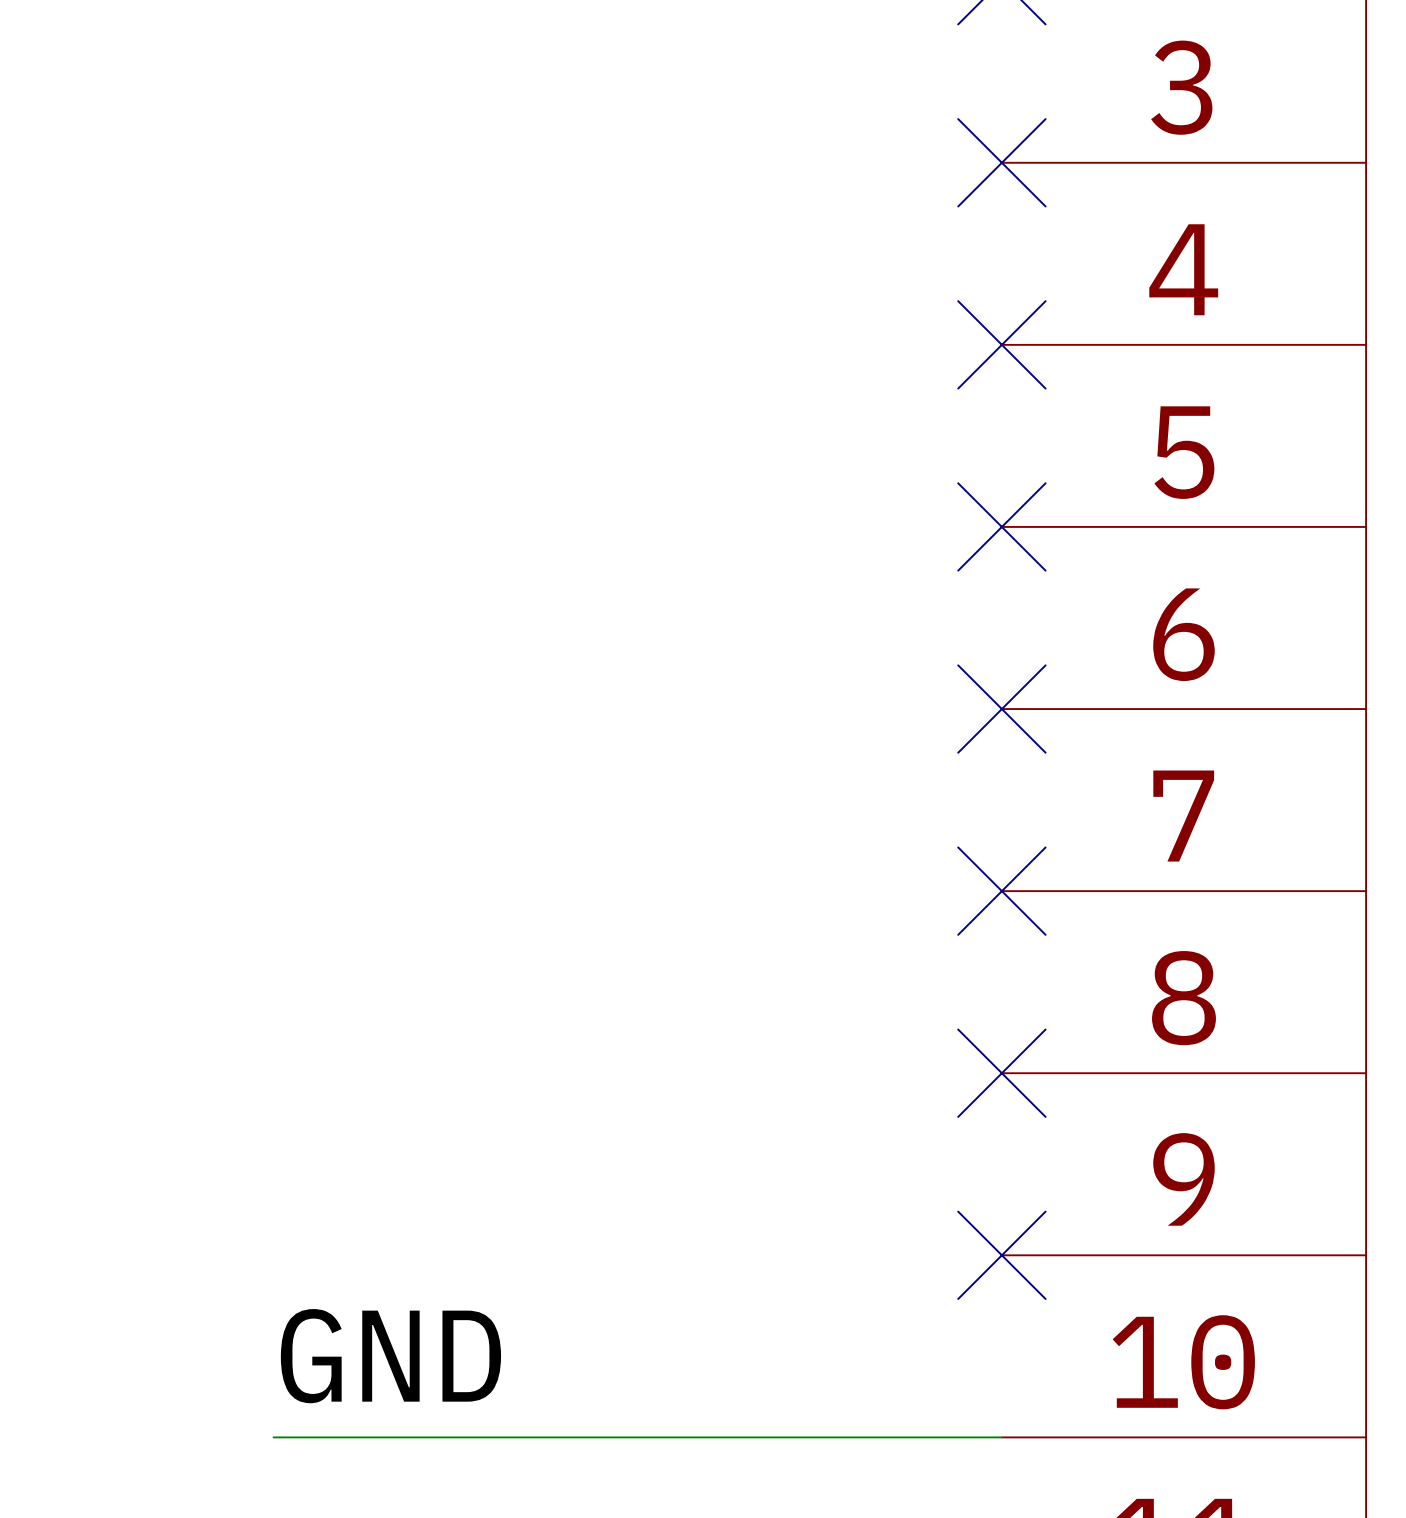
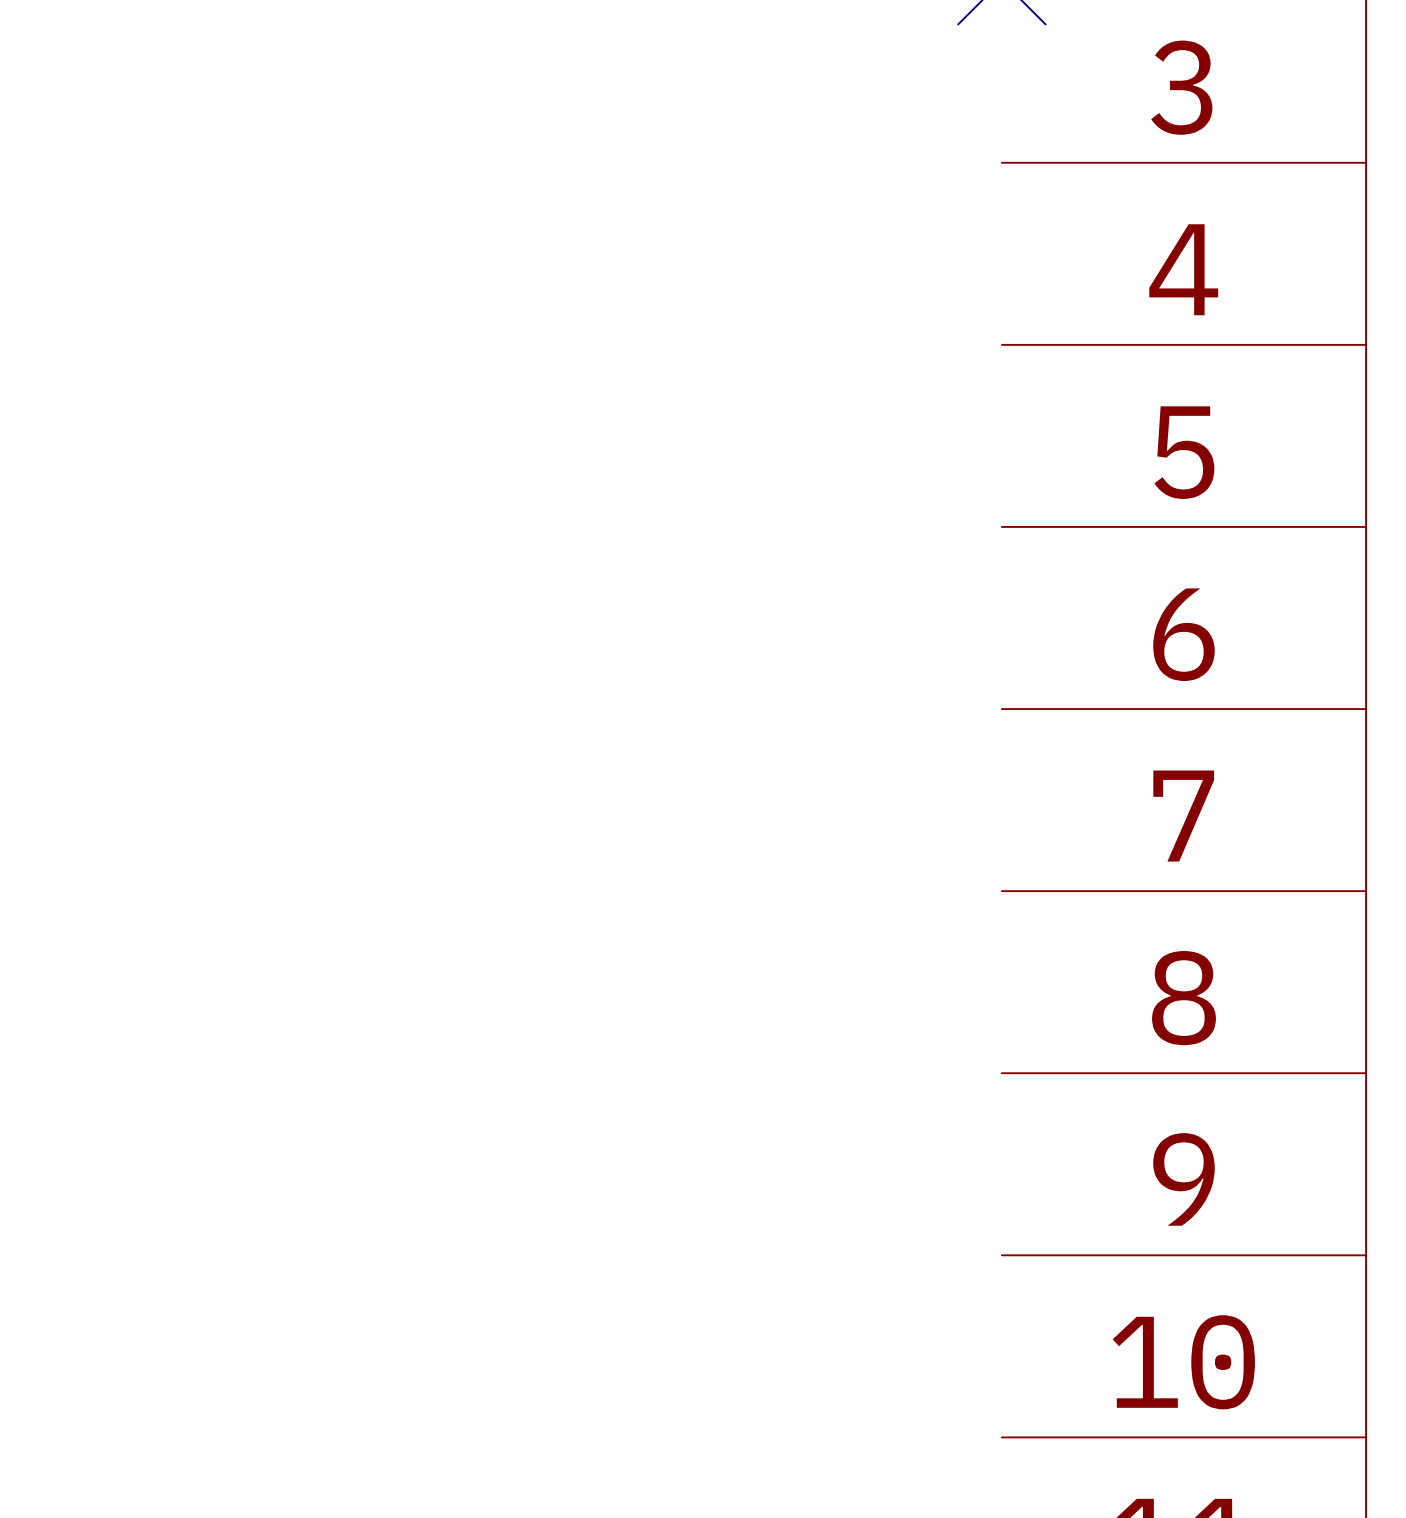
no-connect mark: (1001, 162) -> none
no-connect mark: (1001, 344) -> none
no-connect mark: (1001, 526) -> none
no-connect mark: (1001, 709) -> none
no-connect mark: (1001, 891) -> none
no-connect mark: (1001, 1073) -> none
no-connect mark: (1001, 1255) -> none
label: GND (390, 1356) -> none
wire: (273, 1437) (1001, 1437) -> none

